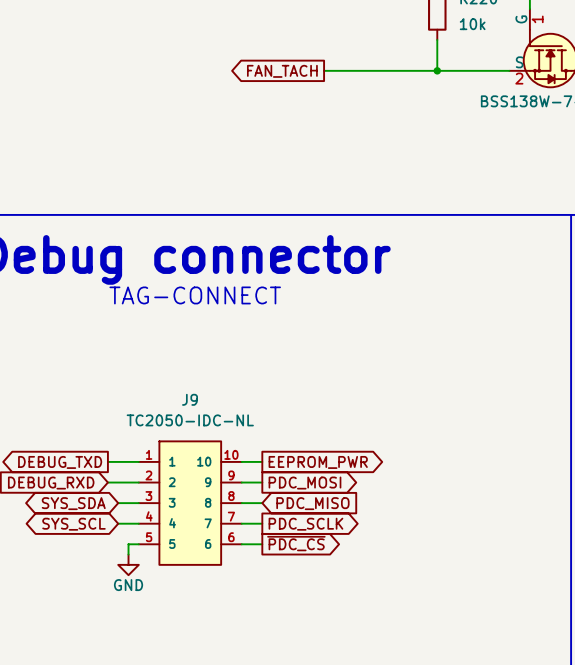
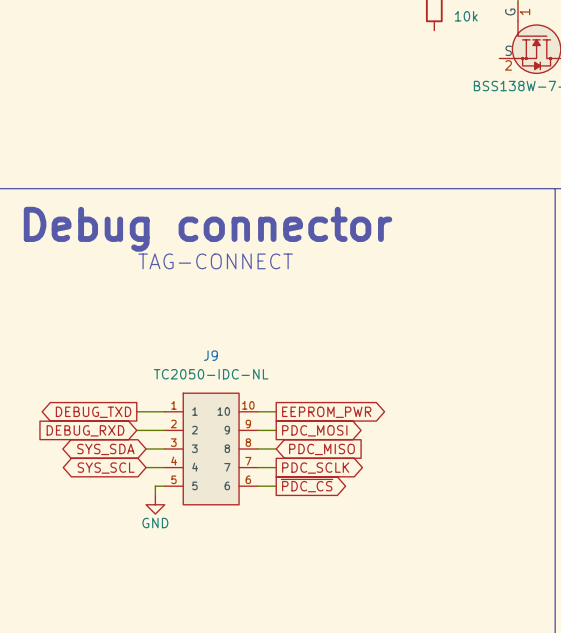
wire: (437, 39) (437, 70) -> none
wire: (324, 70) (509, 70) -> none
junction: (437, 70) -> none
global label: FAN_TACH (282, 71) -> none

